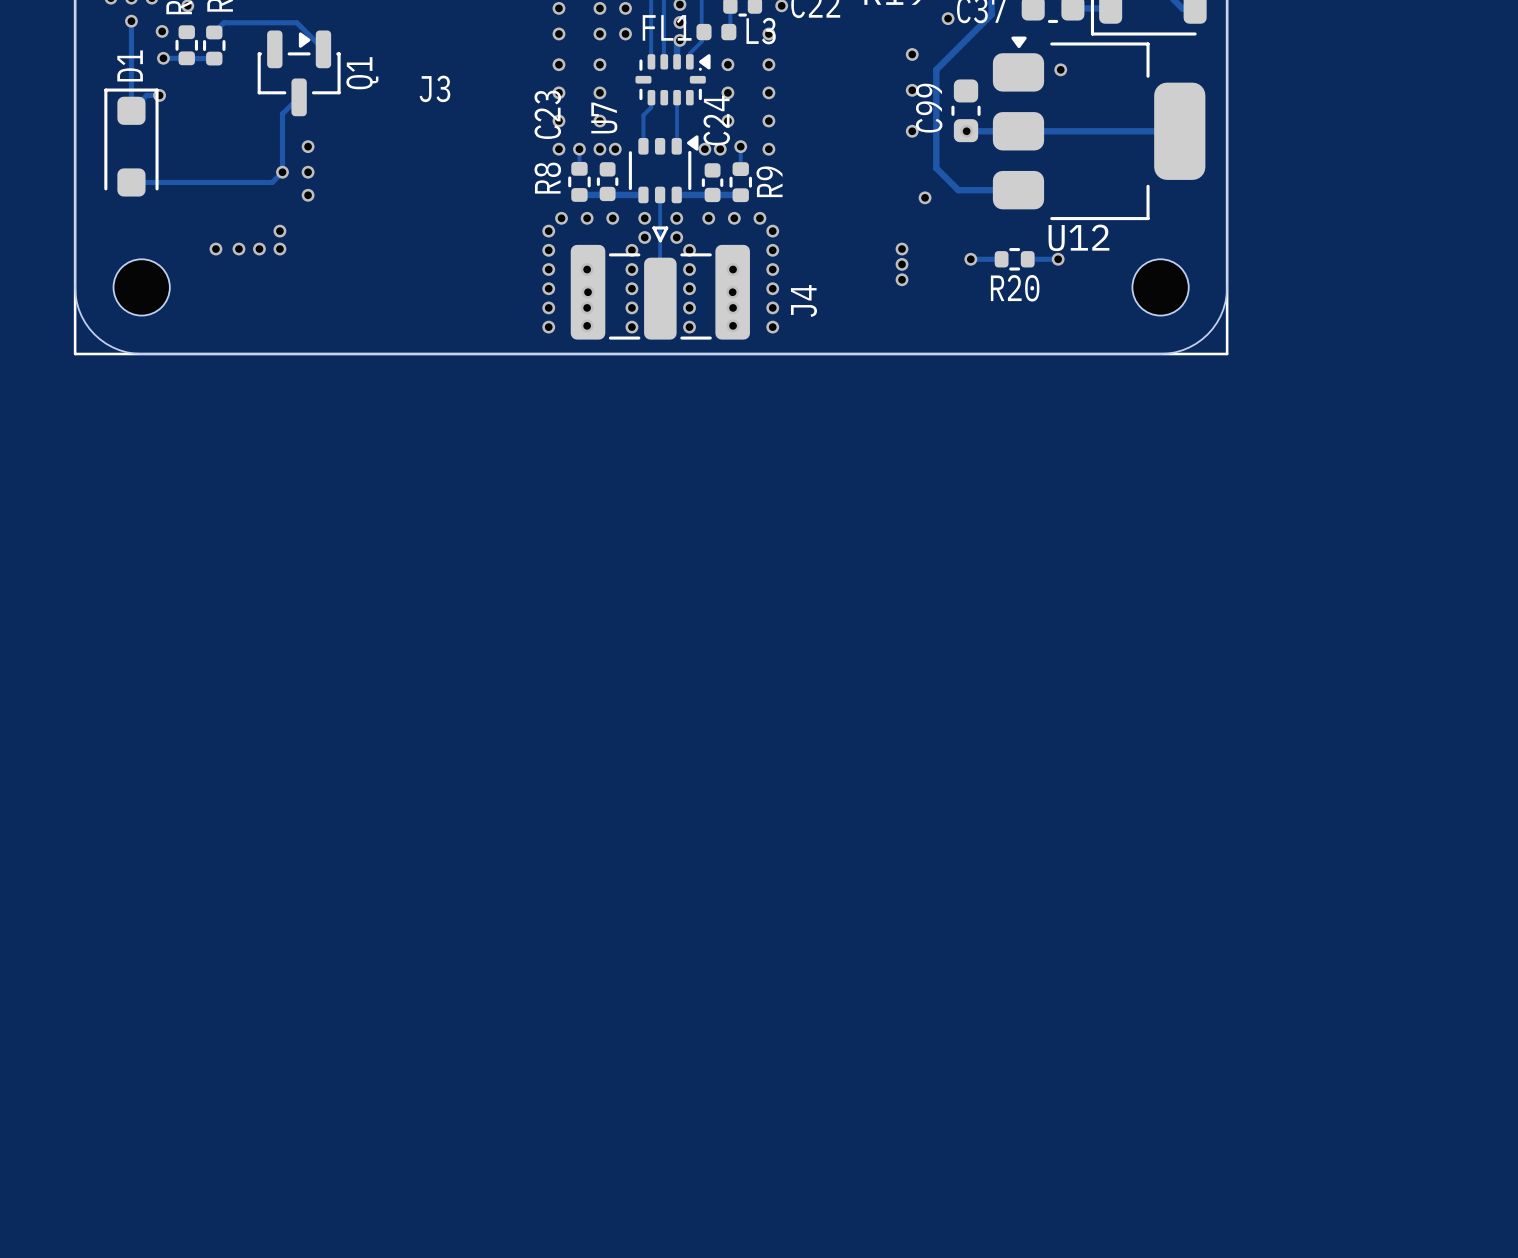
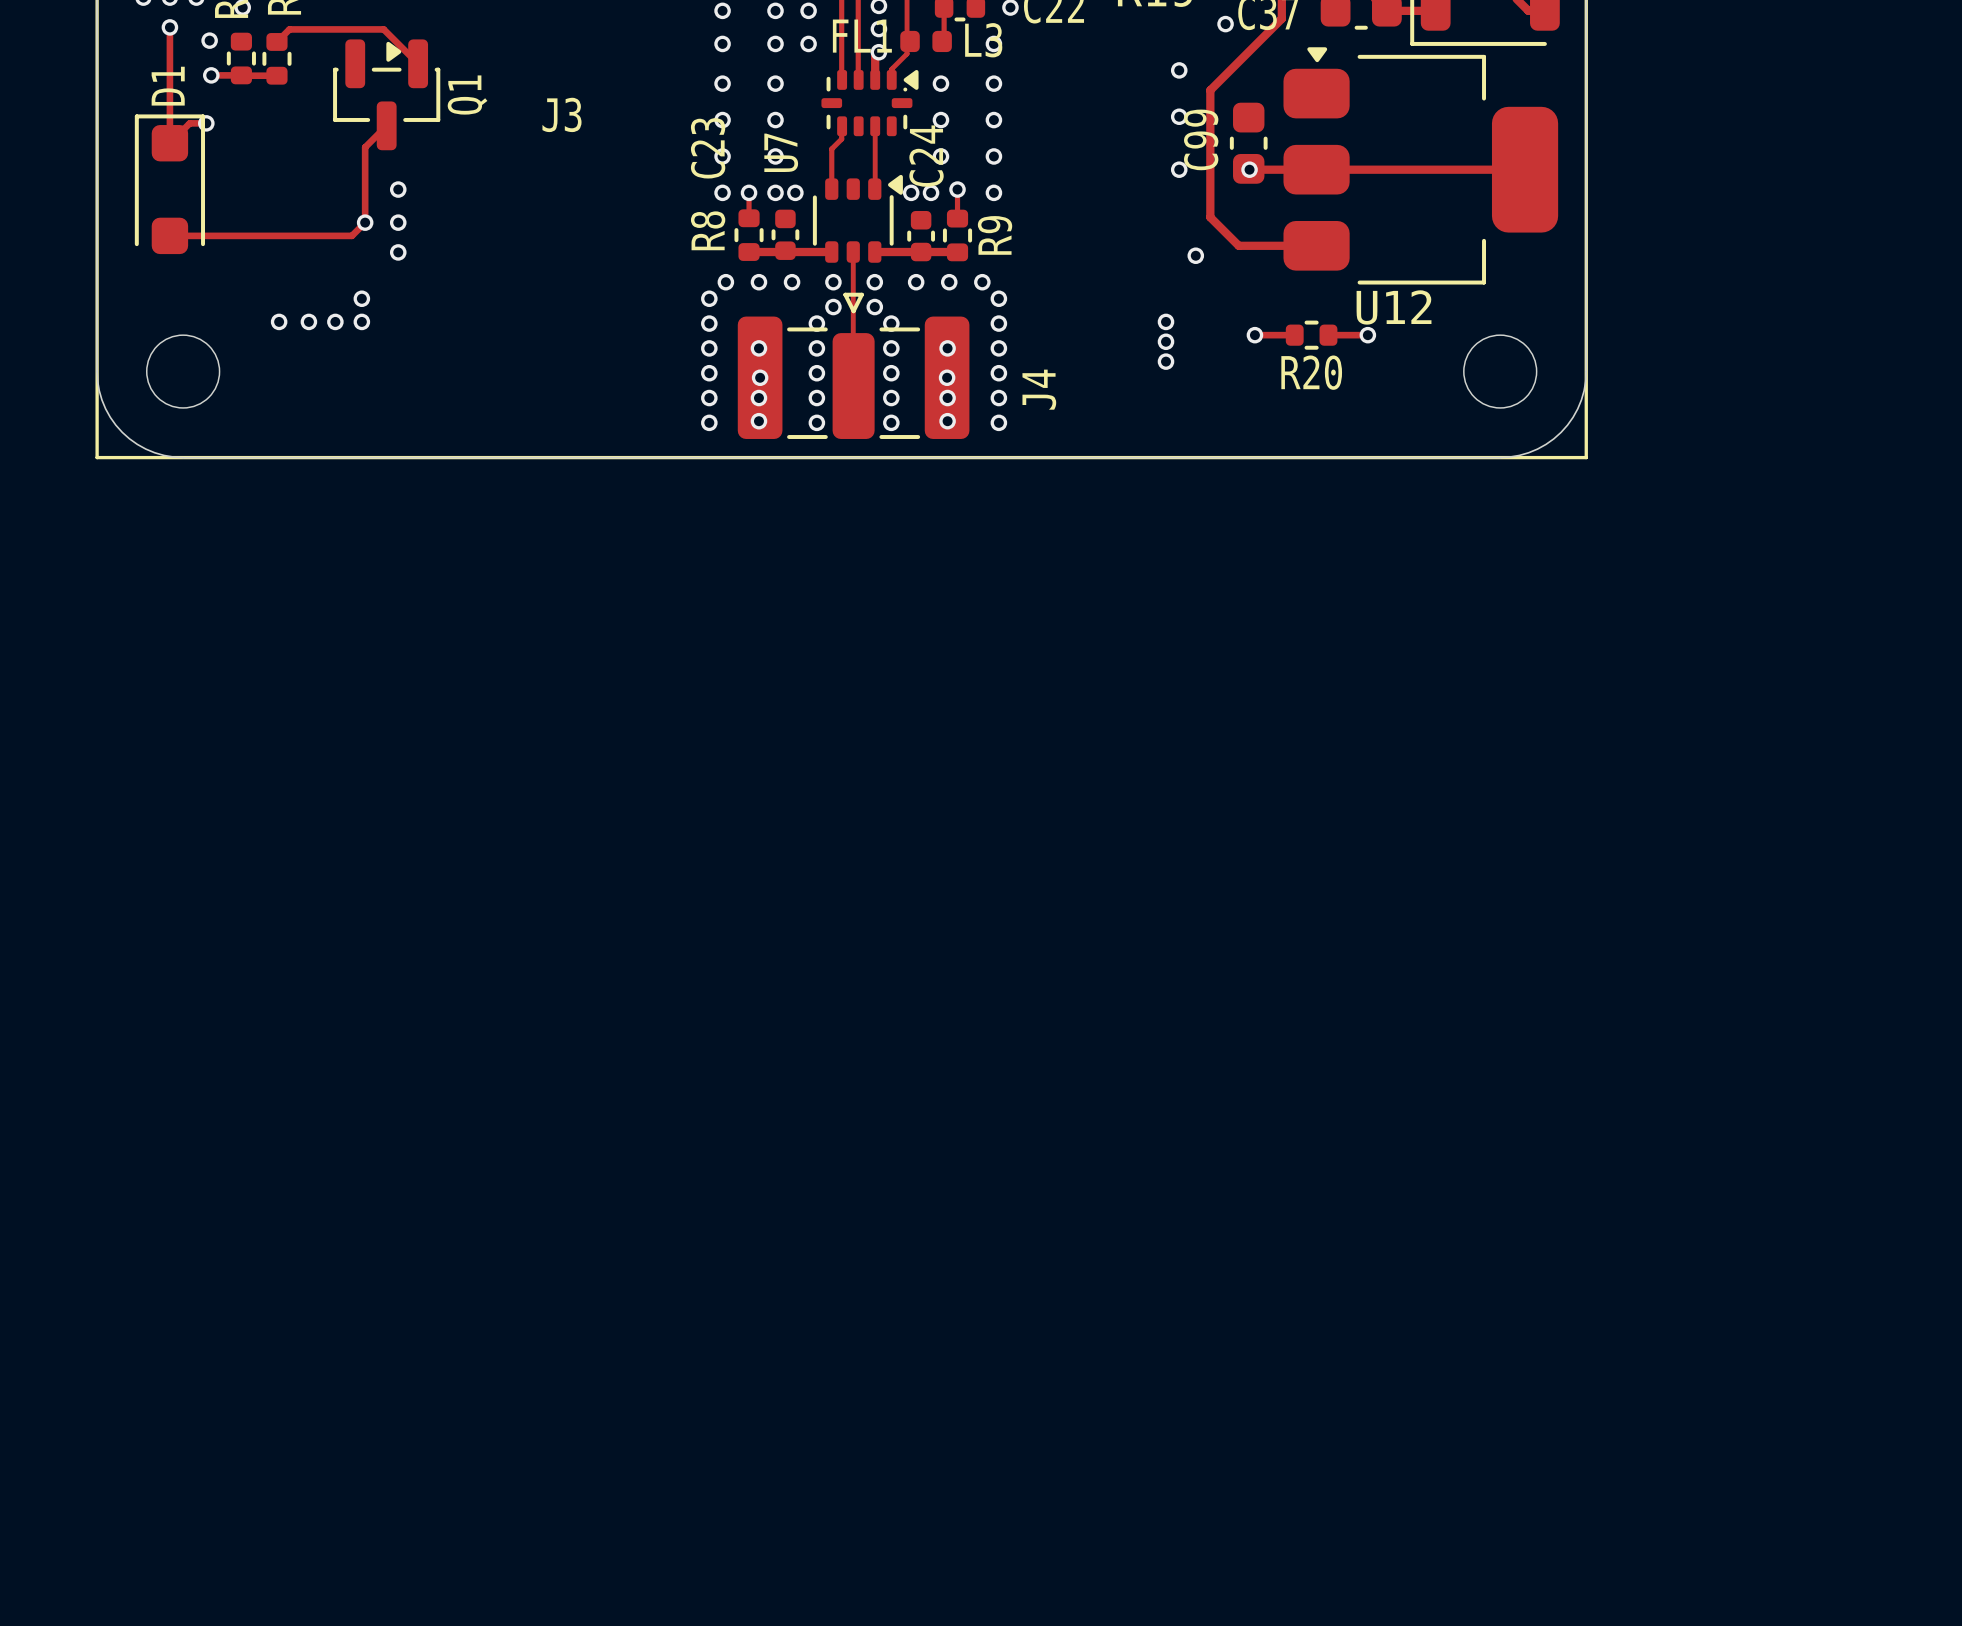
via: (1060, 69) -> none

